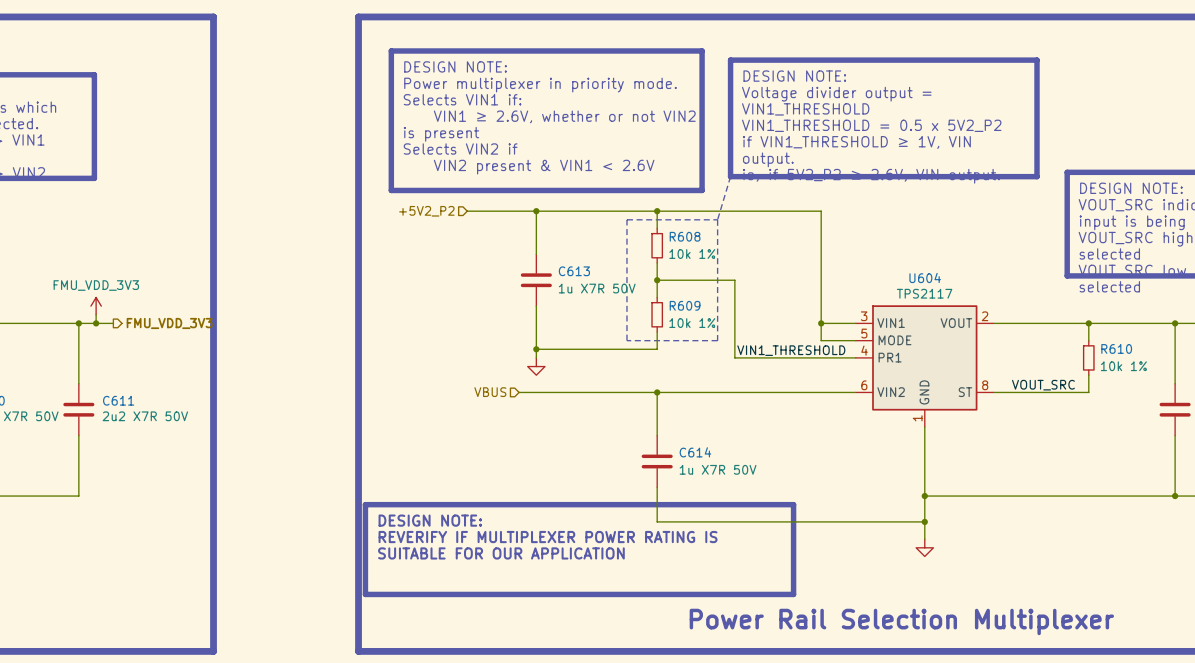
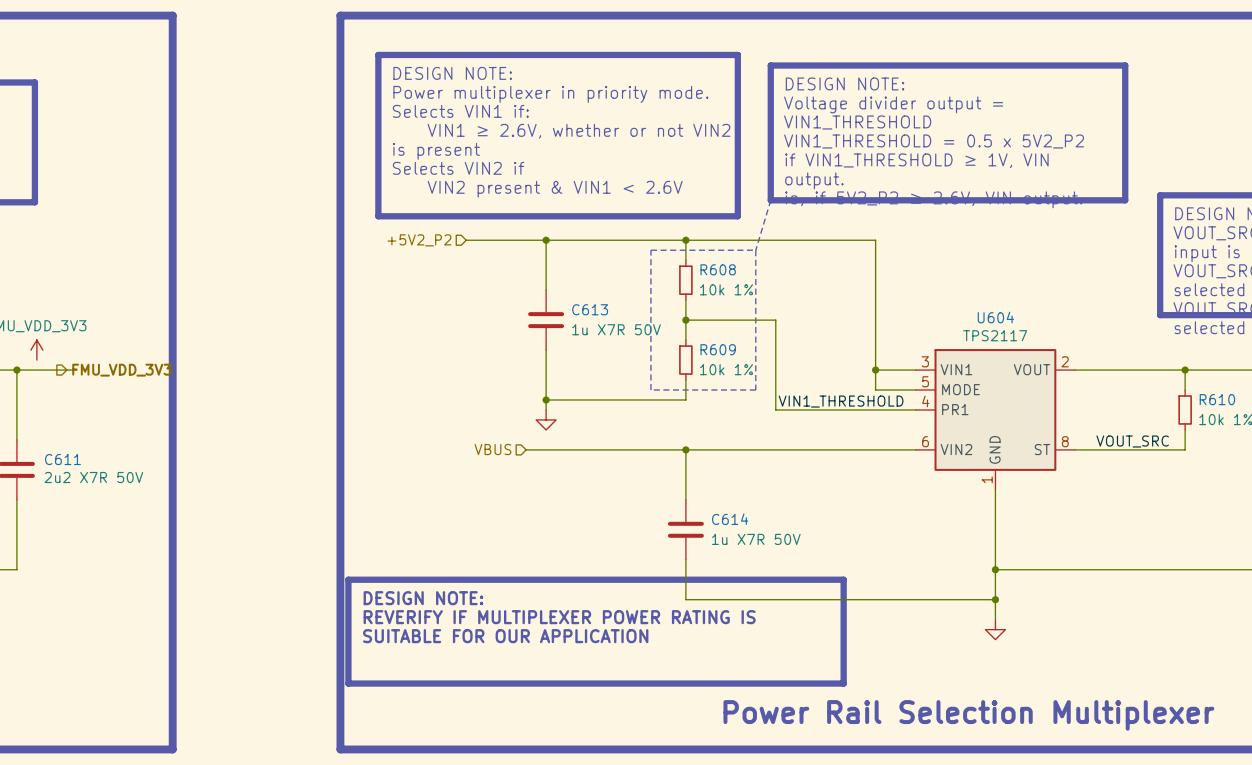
wire: (96, 314) (96, 323) -> none
junction: (96, 323) -> none
wire: none -> (56, 370) (76, 370)

